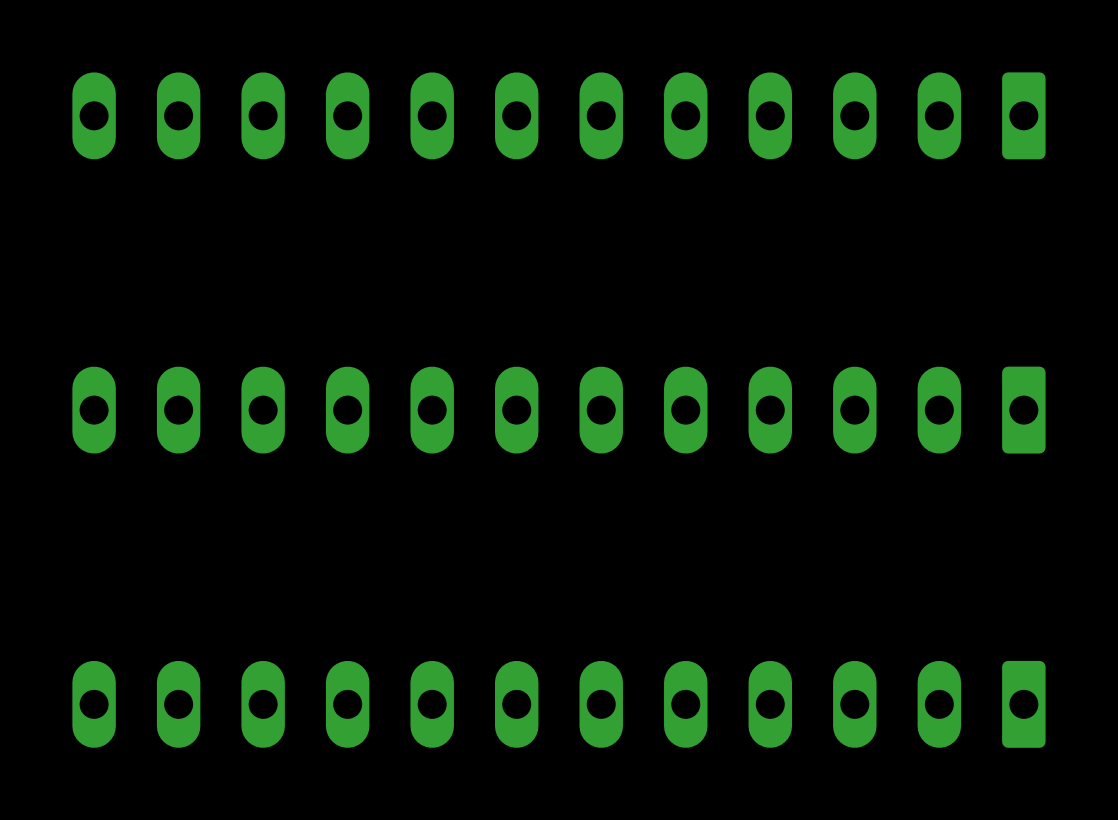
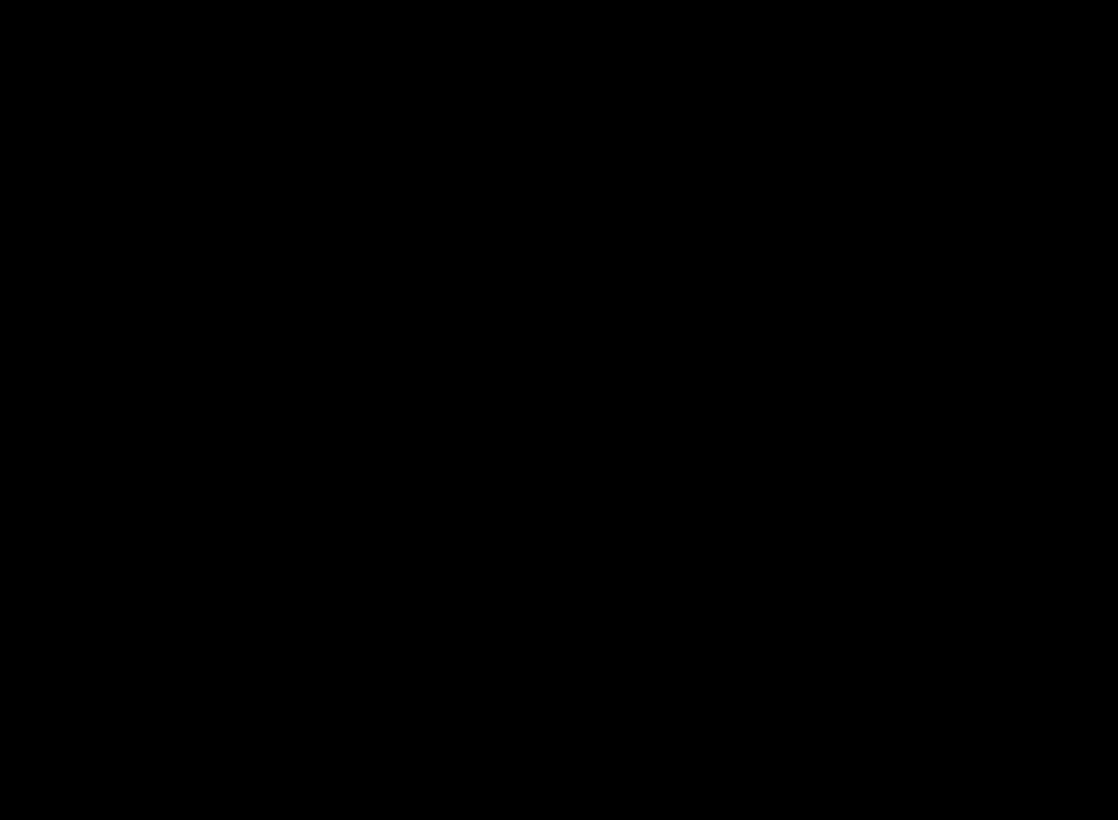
part: (558, 115) -> none
part: (558, 410) -> none
part: (558, 704) -> none

